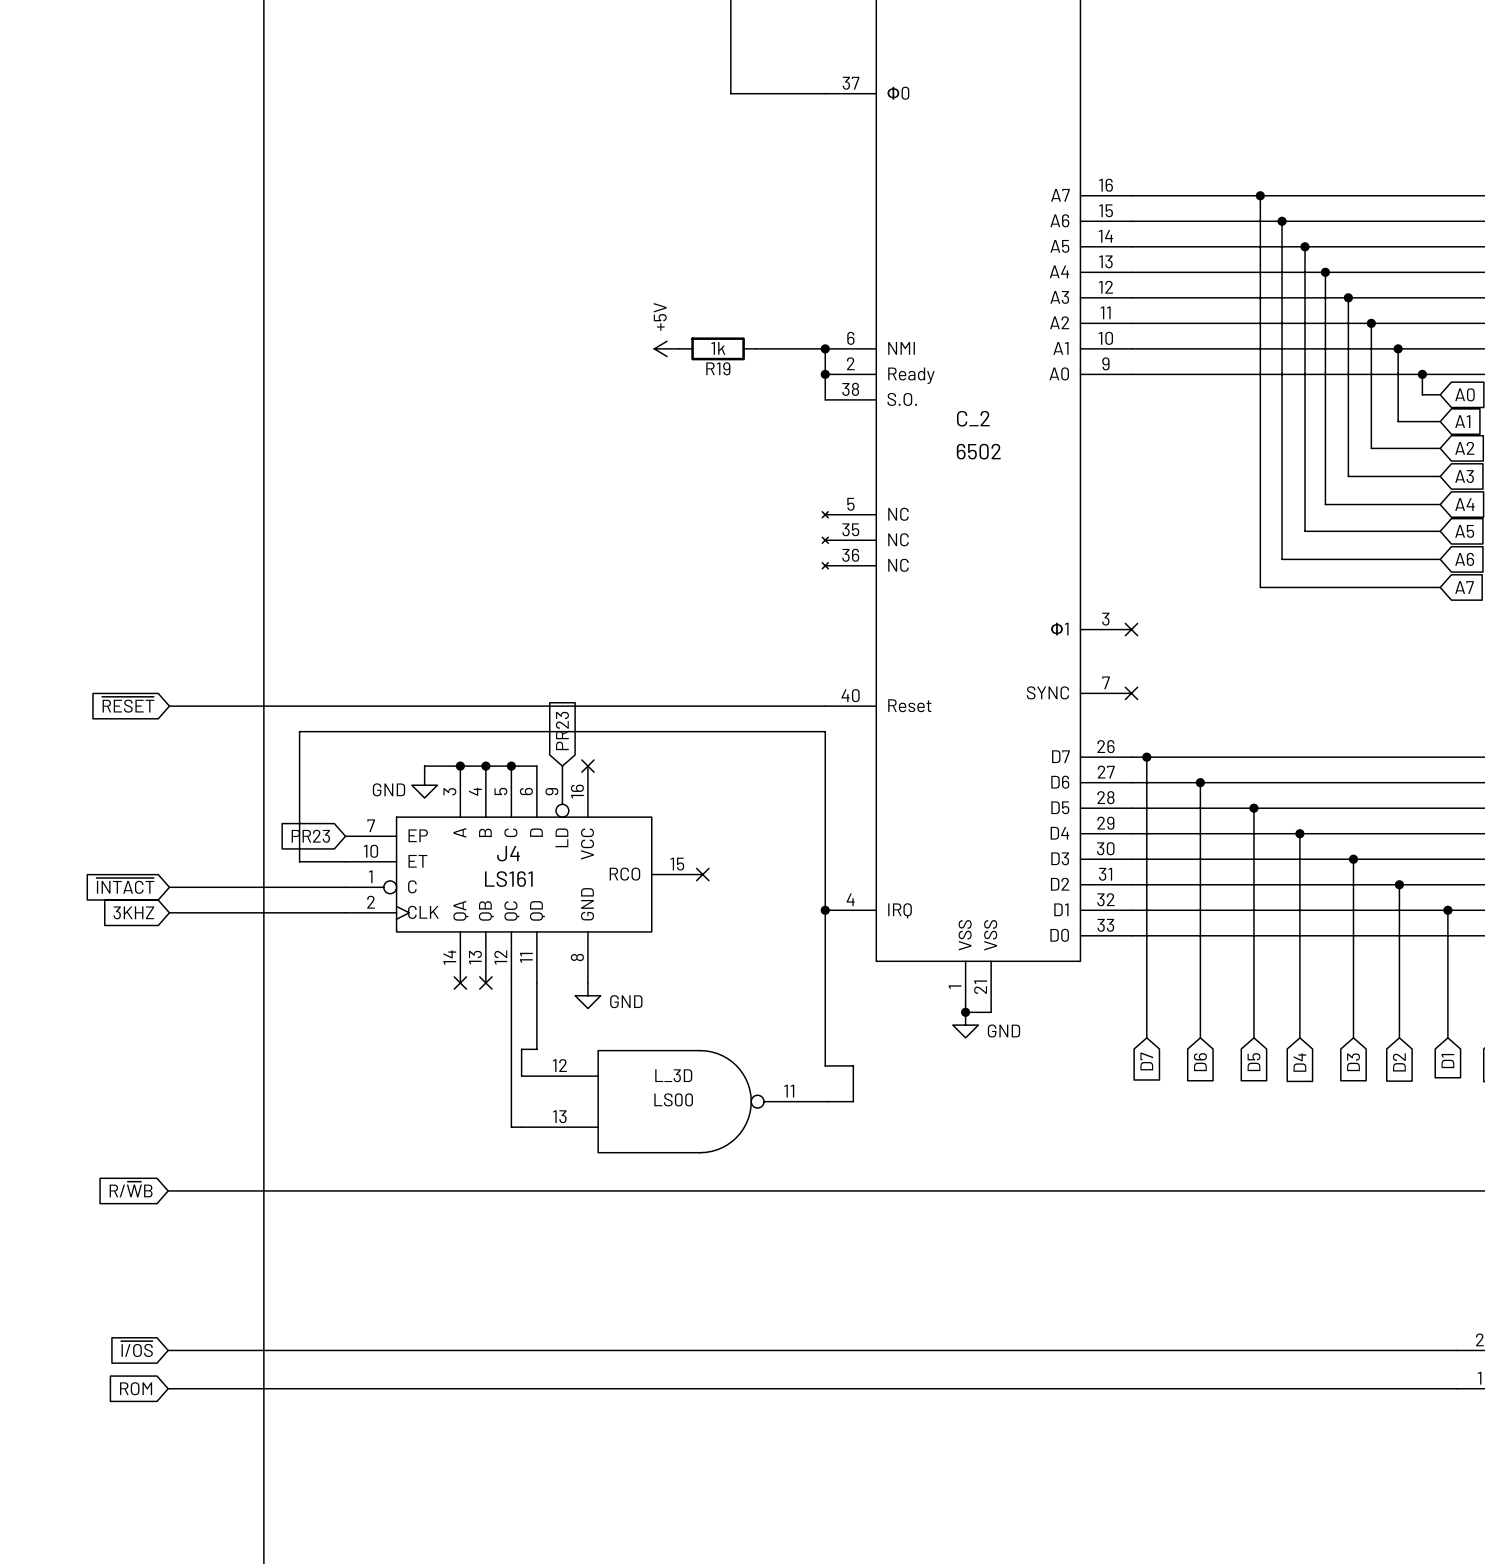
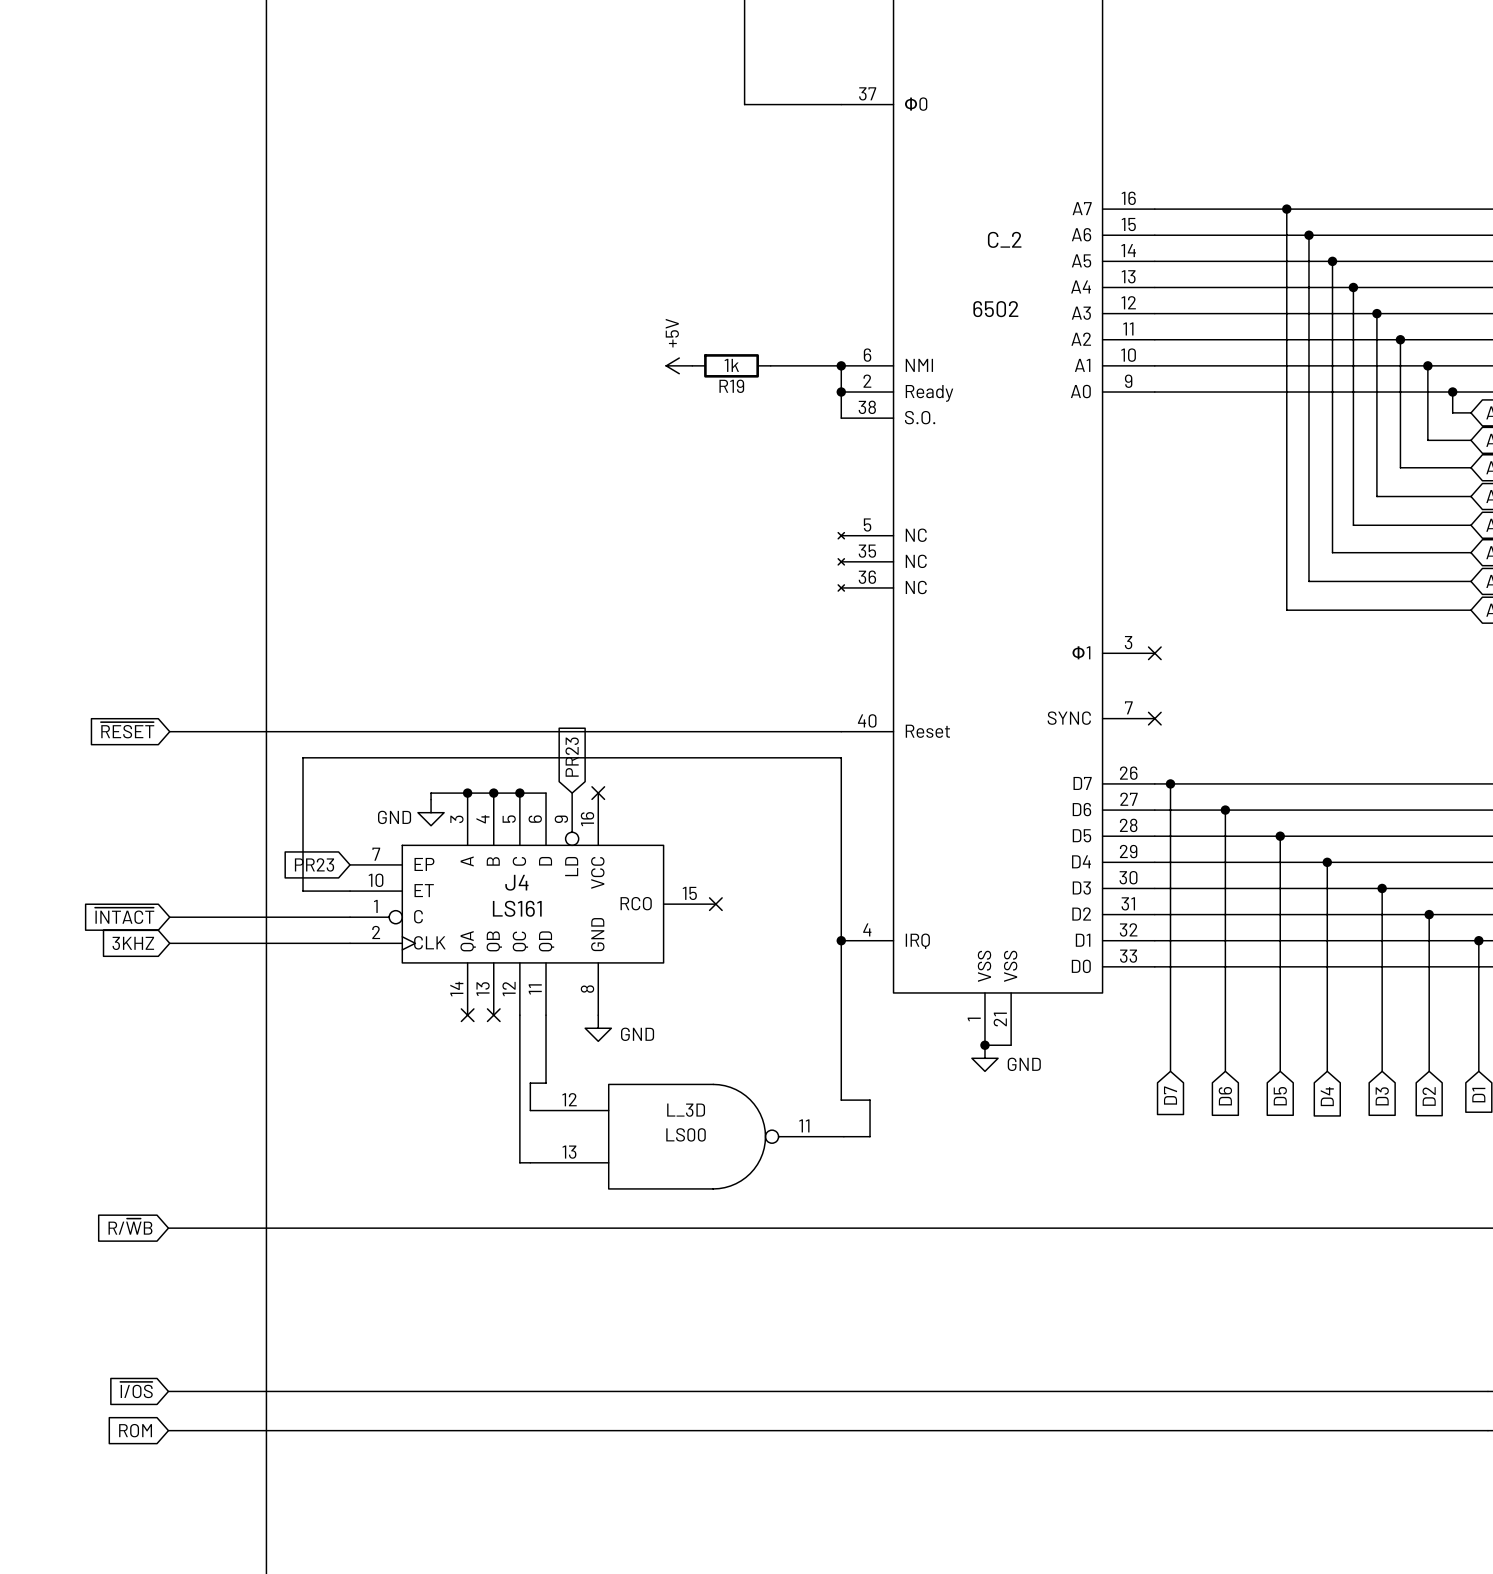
C_2 name position: C_2 (973, 418) -> C_2 (1004, 239)
C_2 value position: 6502 (978, 451) -> 6502 (995, 309)

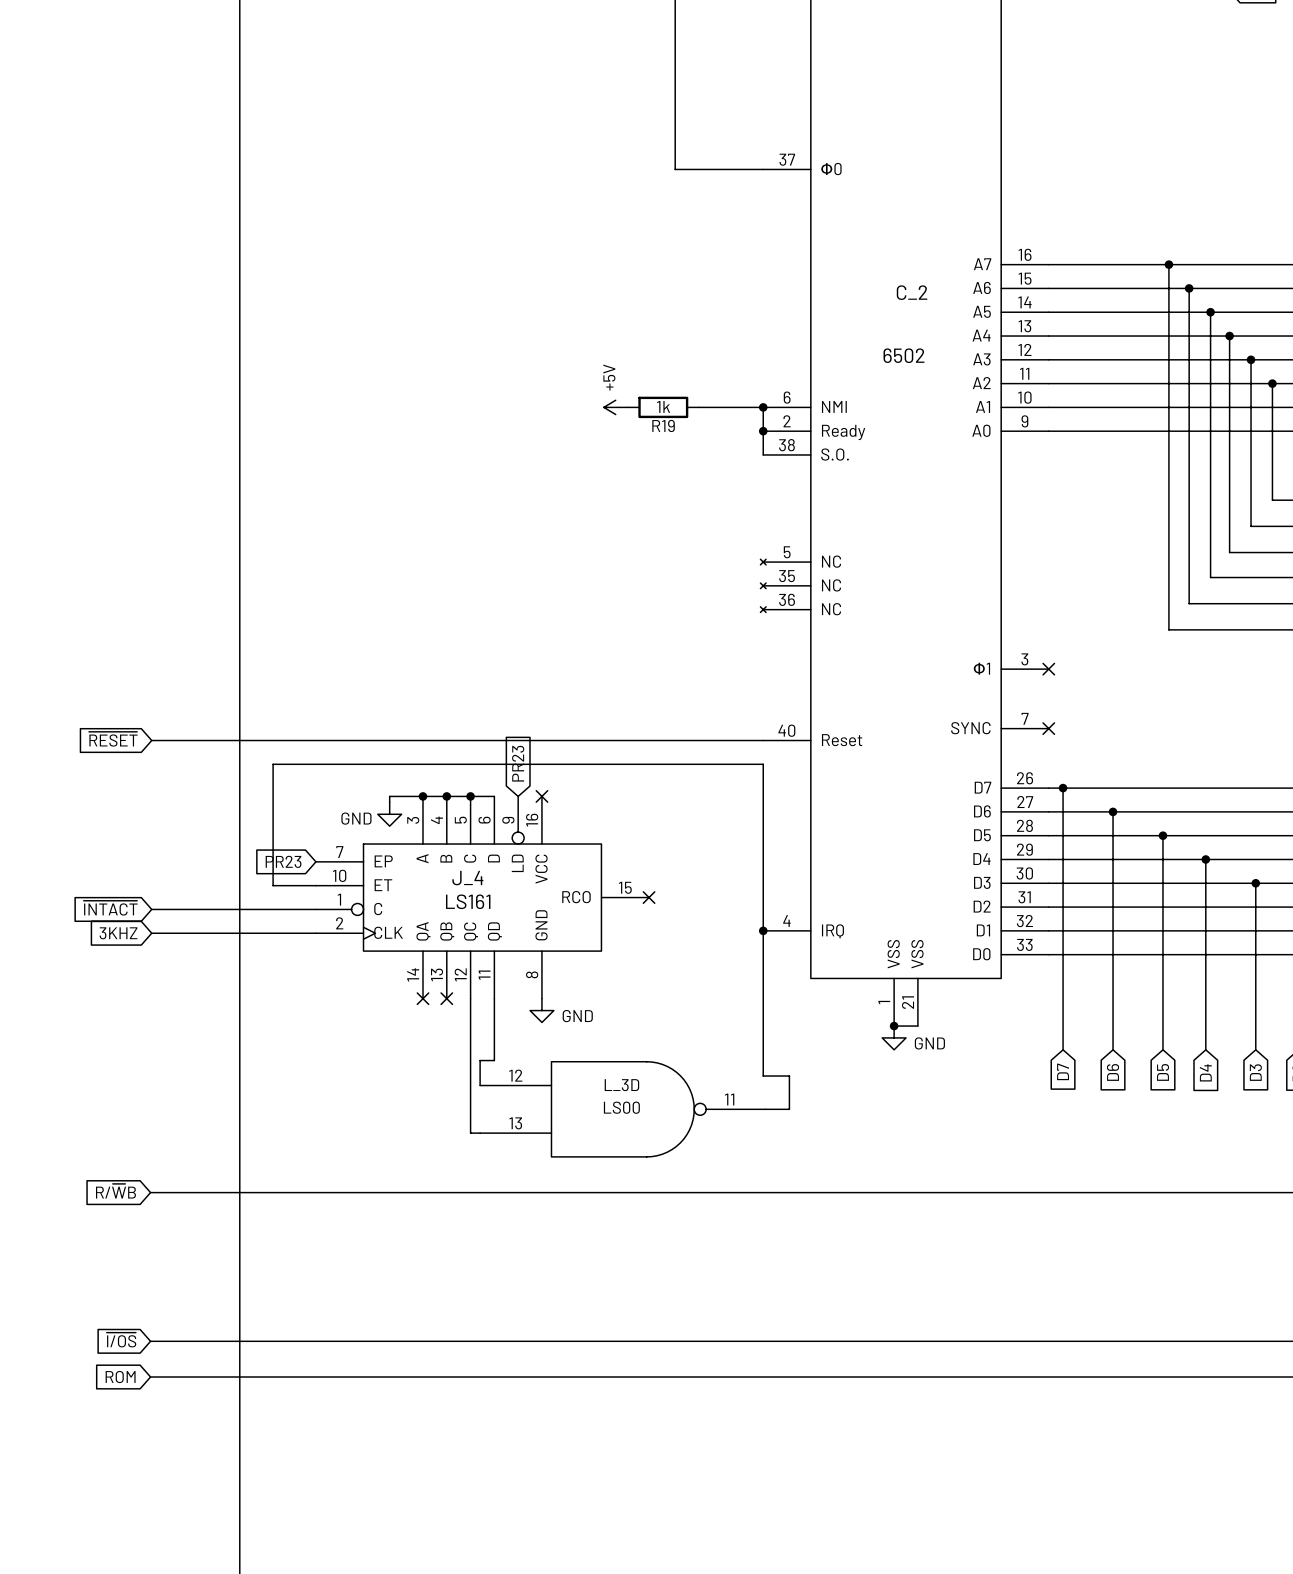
J4 name: J4 (516, 882) -> J_4 (467, 878)

